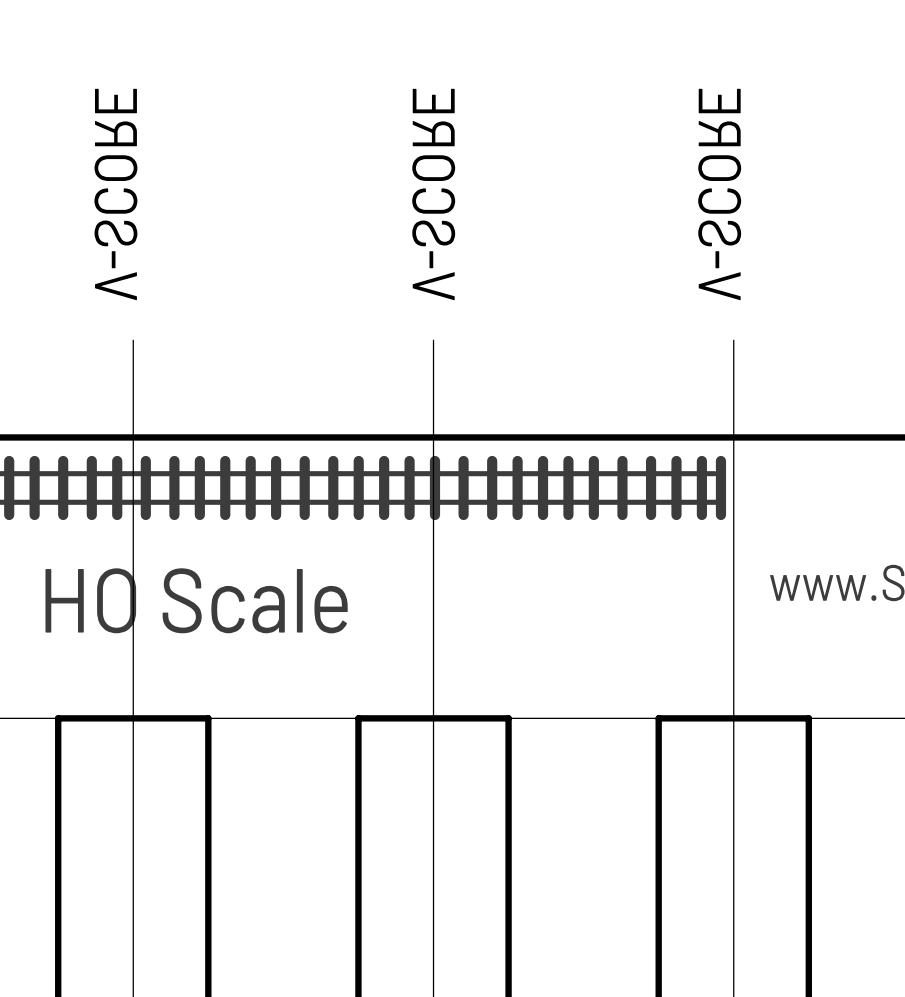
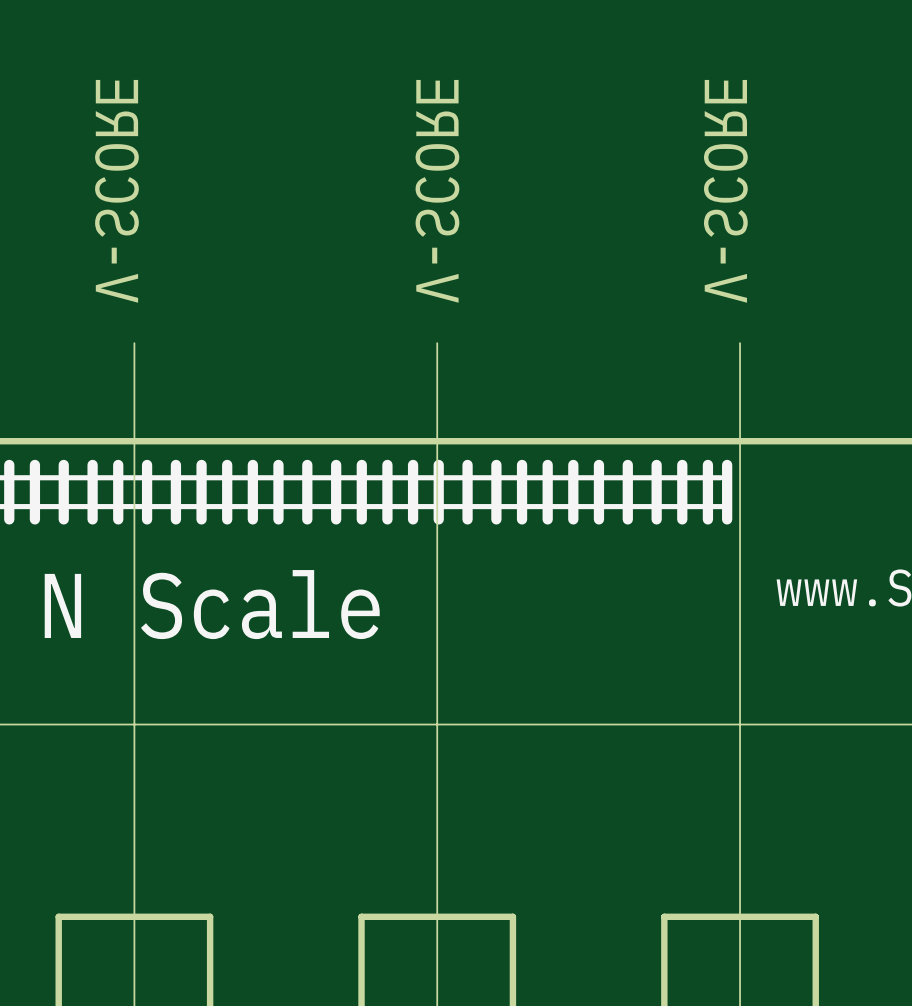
text: HO Scale (196, 600) -> N Scale (212, 604)
board edge: (208, 909) (208, 718) (58, 718) (58, 909) -> (210, 916) (58, 916)
board edge: (508, 909) (508, 718) (358, 718) (358, 909) -> (512, 916) (361, 916)
board edge: (808, 909) (808, 718) (658, 718) (658, 909) -> (815, 916) (664, 916)

